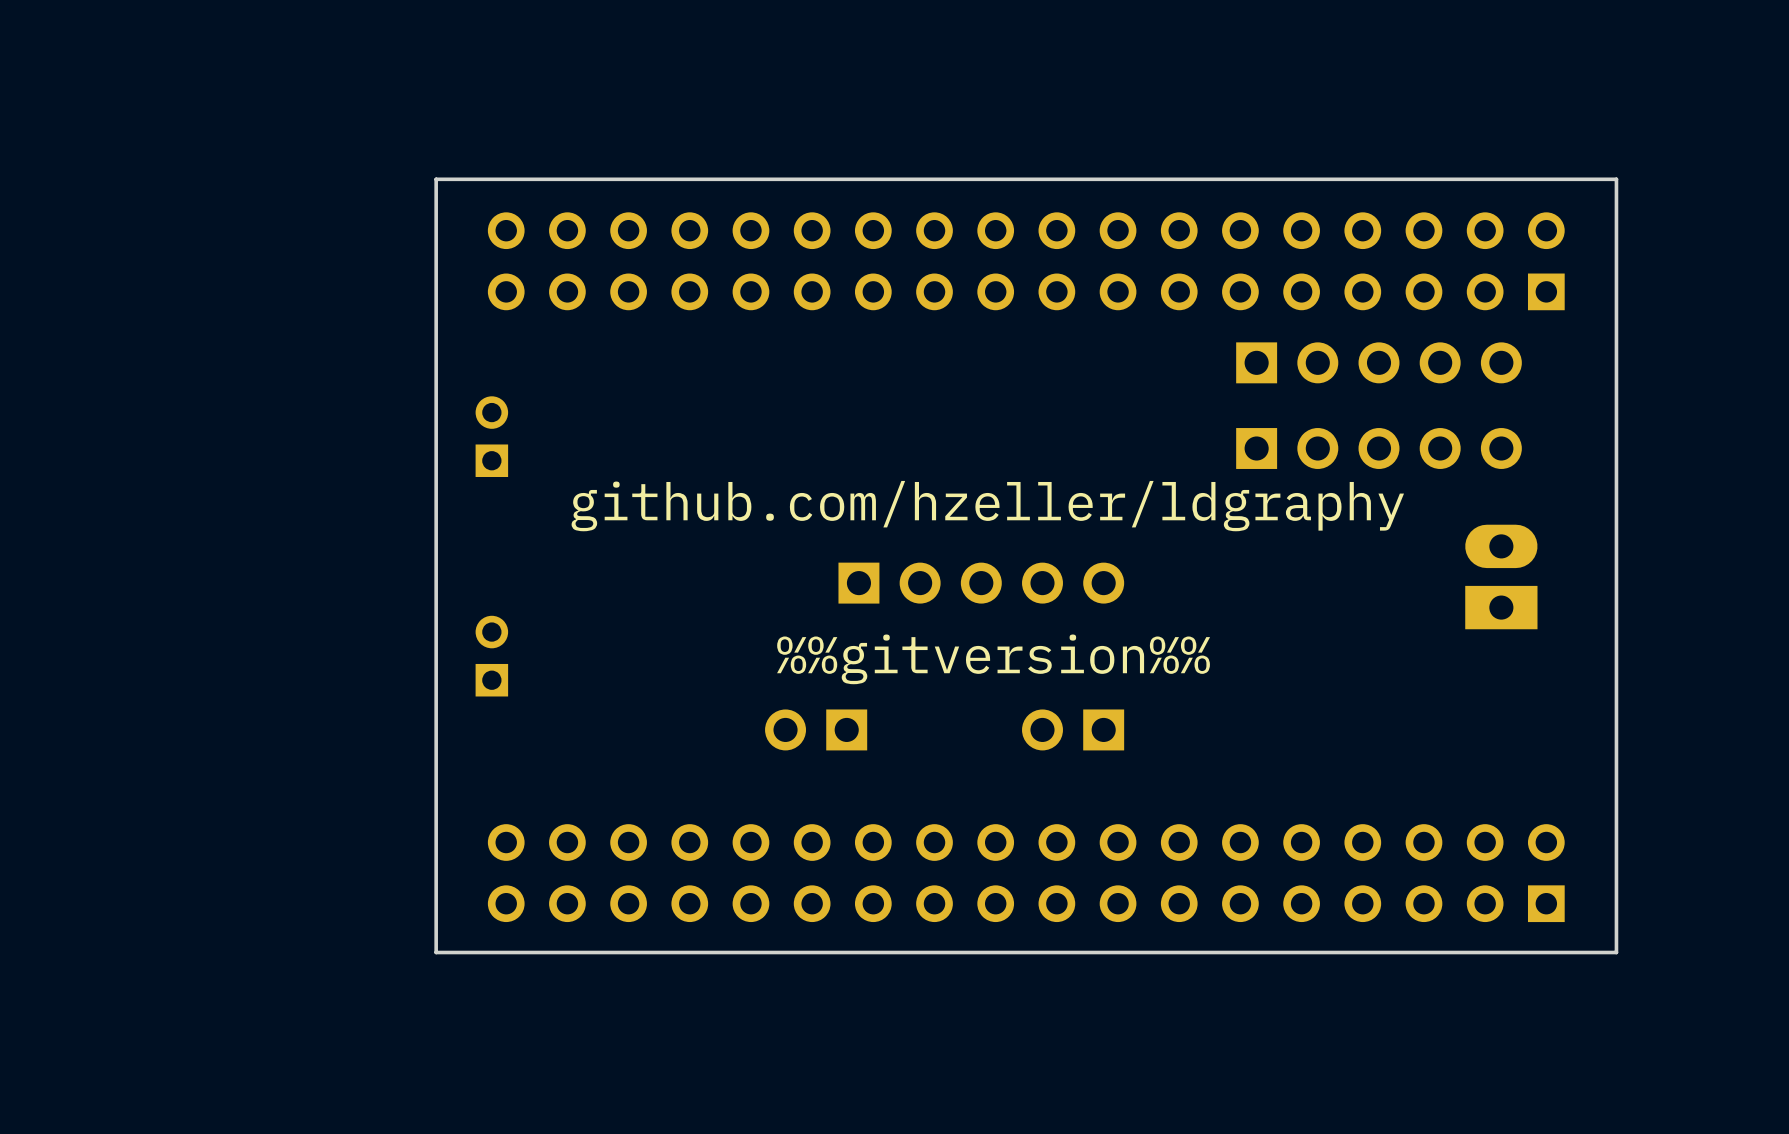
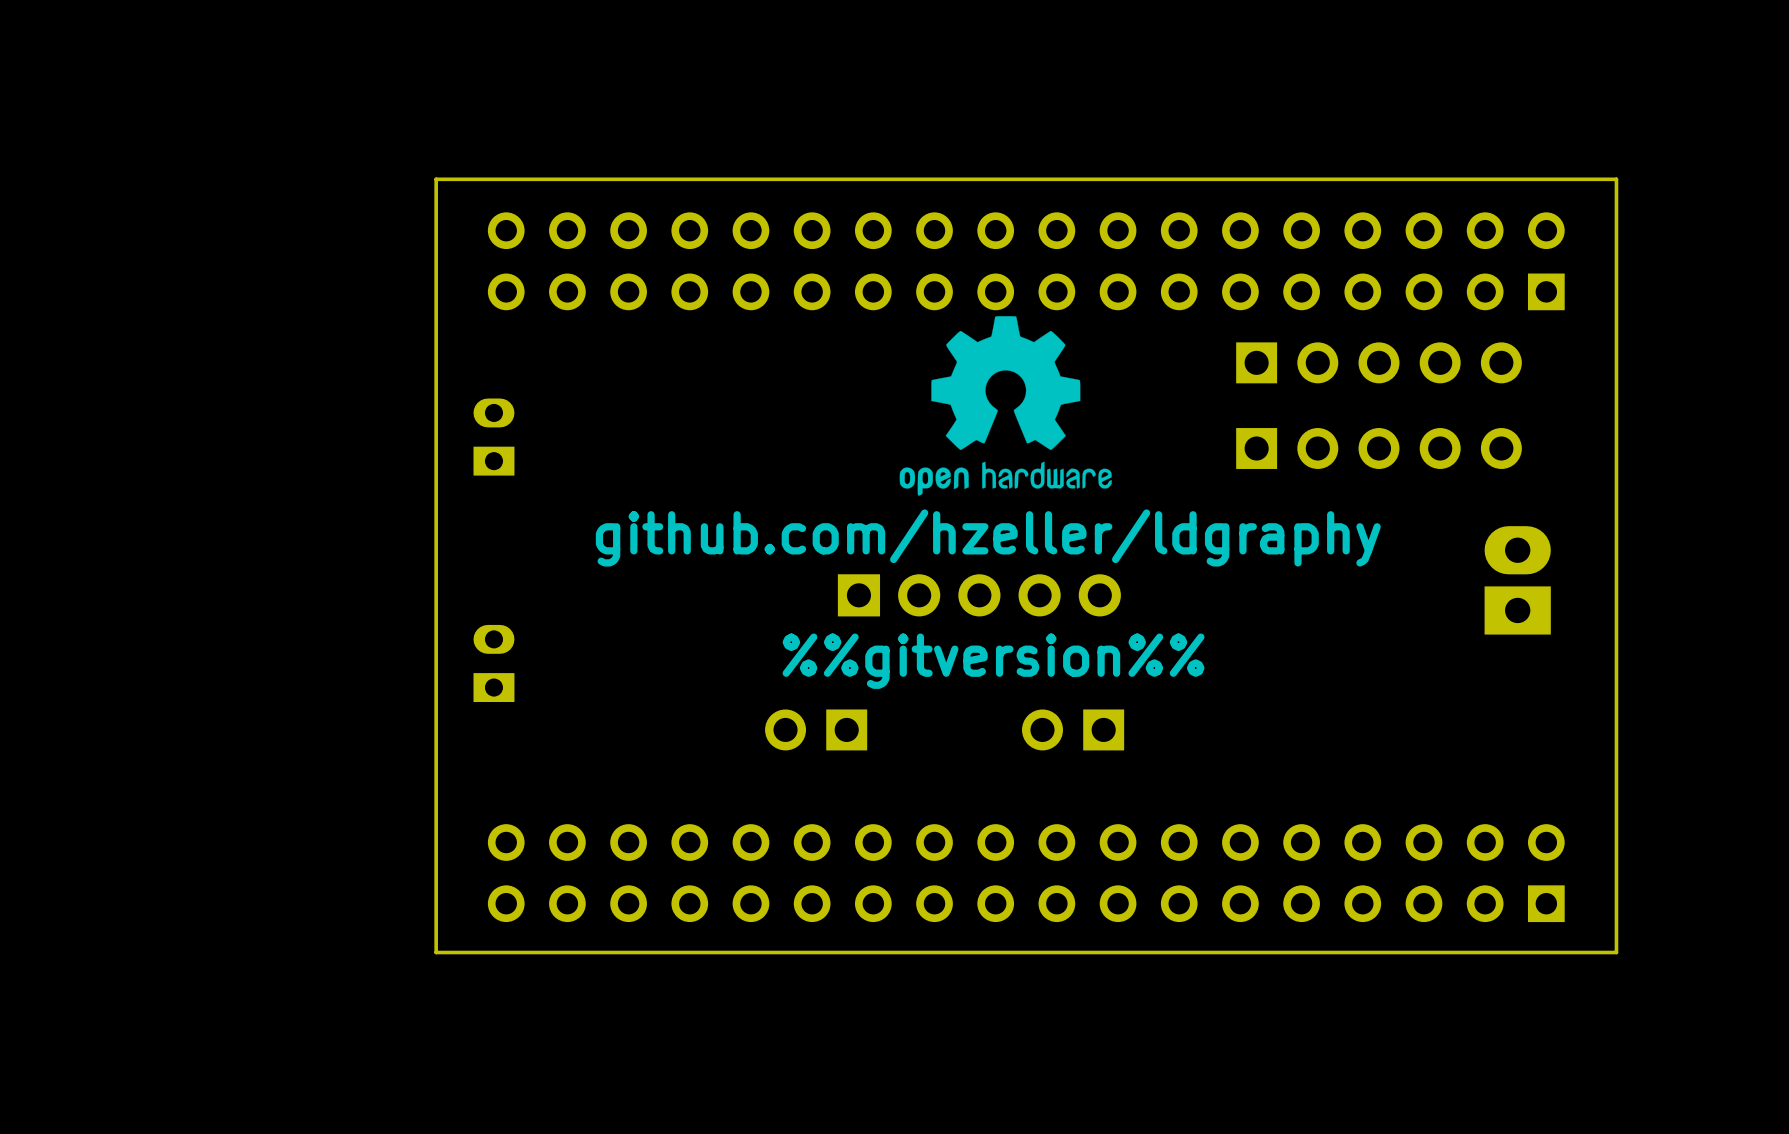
drawing: none -> [899, 316, 1112, 496]
part footprint: [475, 396, 509, 478] -> [473, 398, 515, 476]
text position: github.com/hzeller/ldgraphy (987, 506) -> github.com/hzeller/ldgraphy (988, 537)
part footprint: [1465, 524, 1538, 630] -> [1484, 526, 1551, 635]
part footprint: [838, 562, 1125, 604] -> [837, 574, 1121, 617]
part footprint: [475, 615, 509, 697] -> [473, 624, 515, 703]

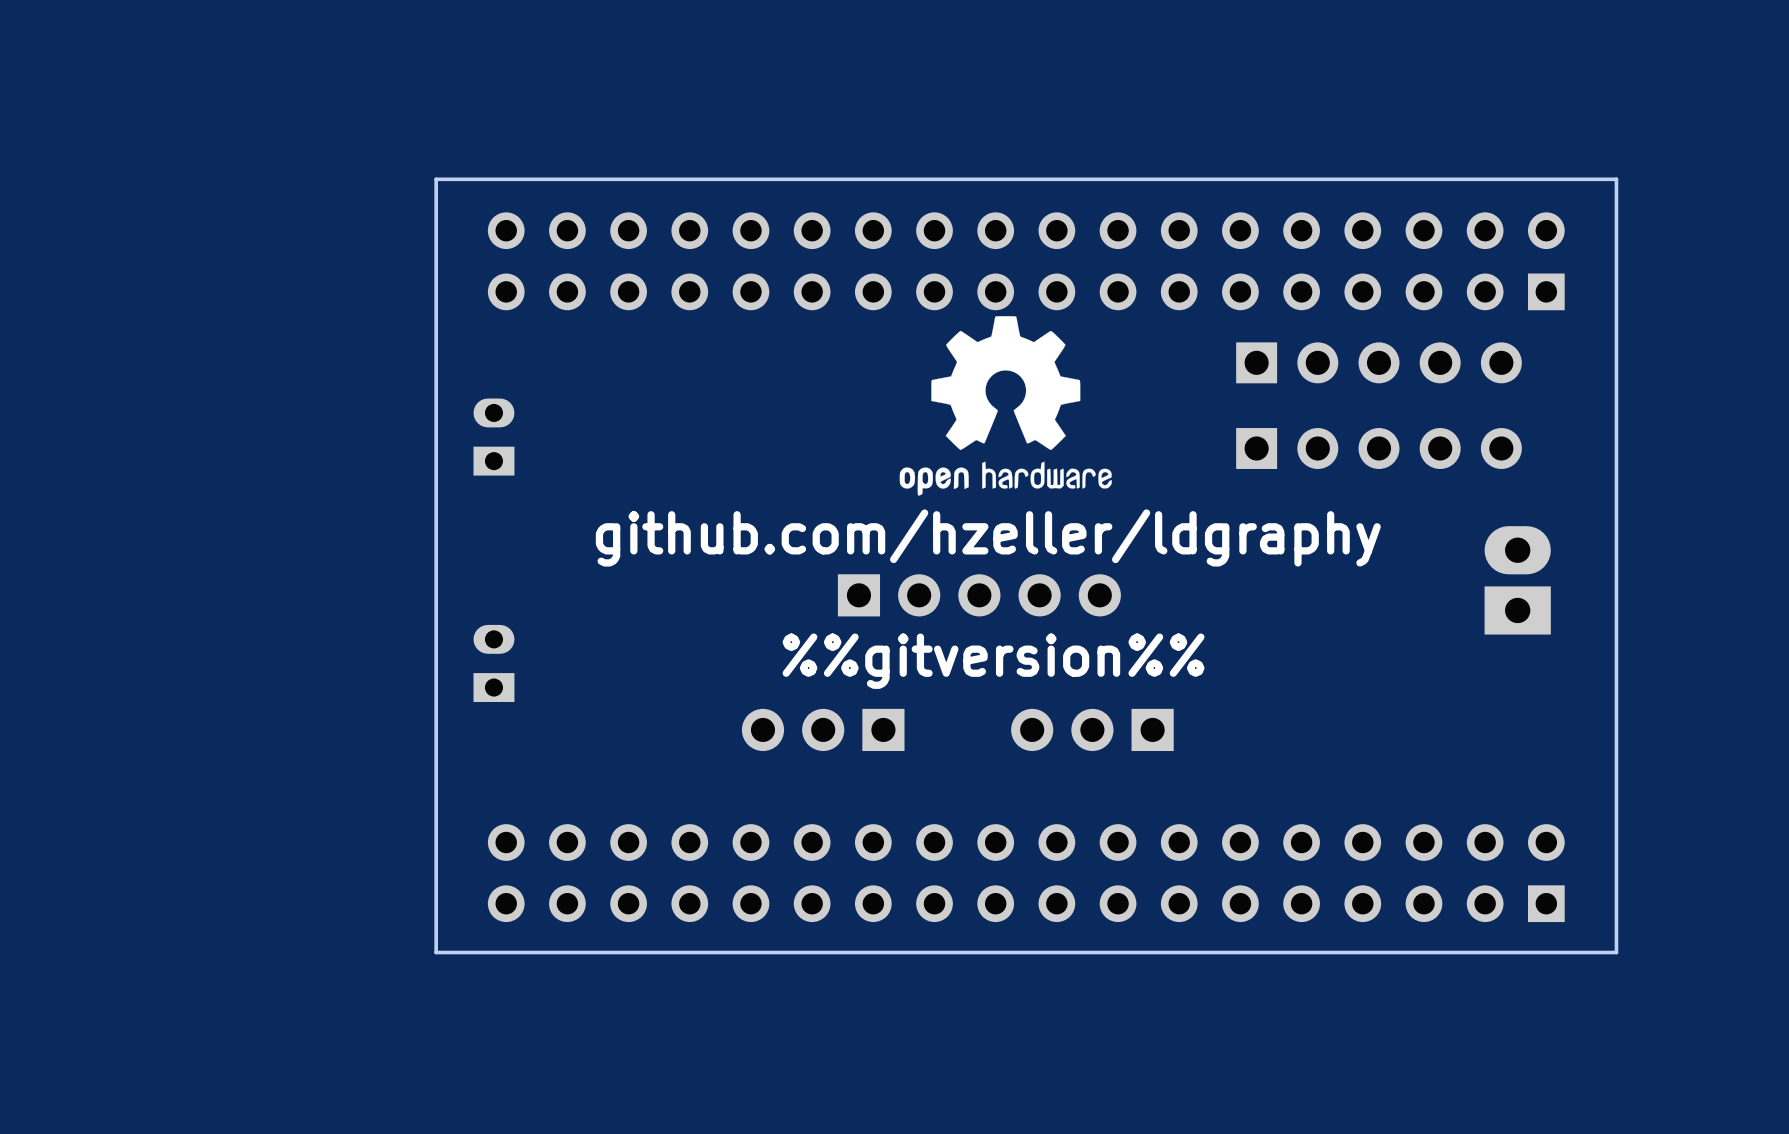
part footprint: [765, 709, 868, 751] -> [741, 708, 905, 752]
part footprint: [1022, 709, 1125, 751] -> [1011, 708, 1174, 752]

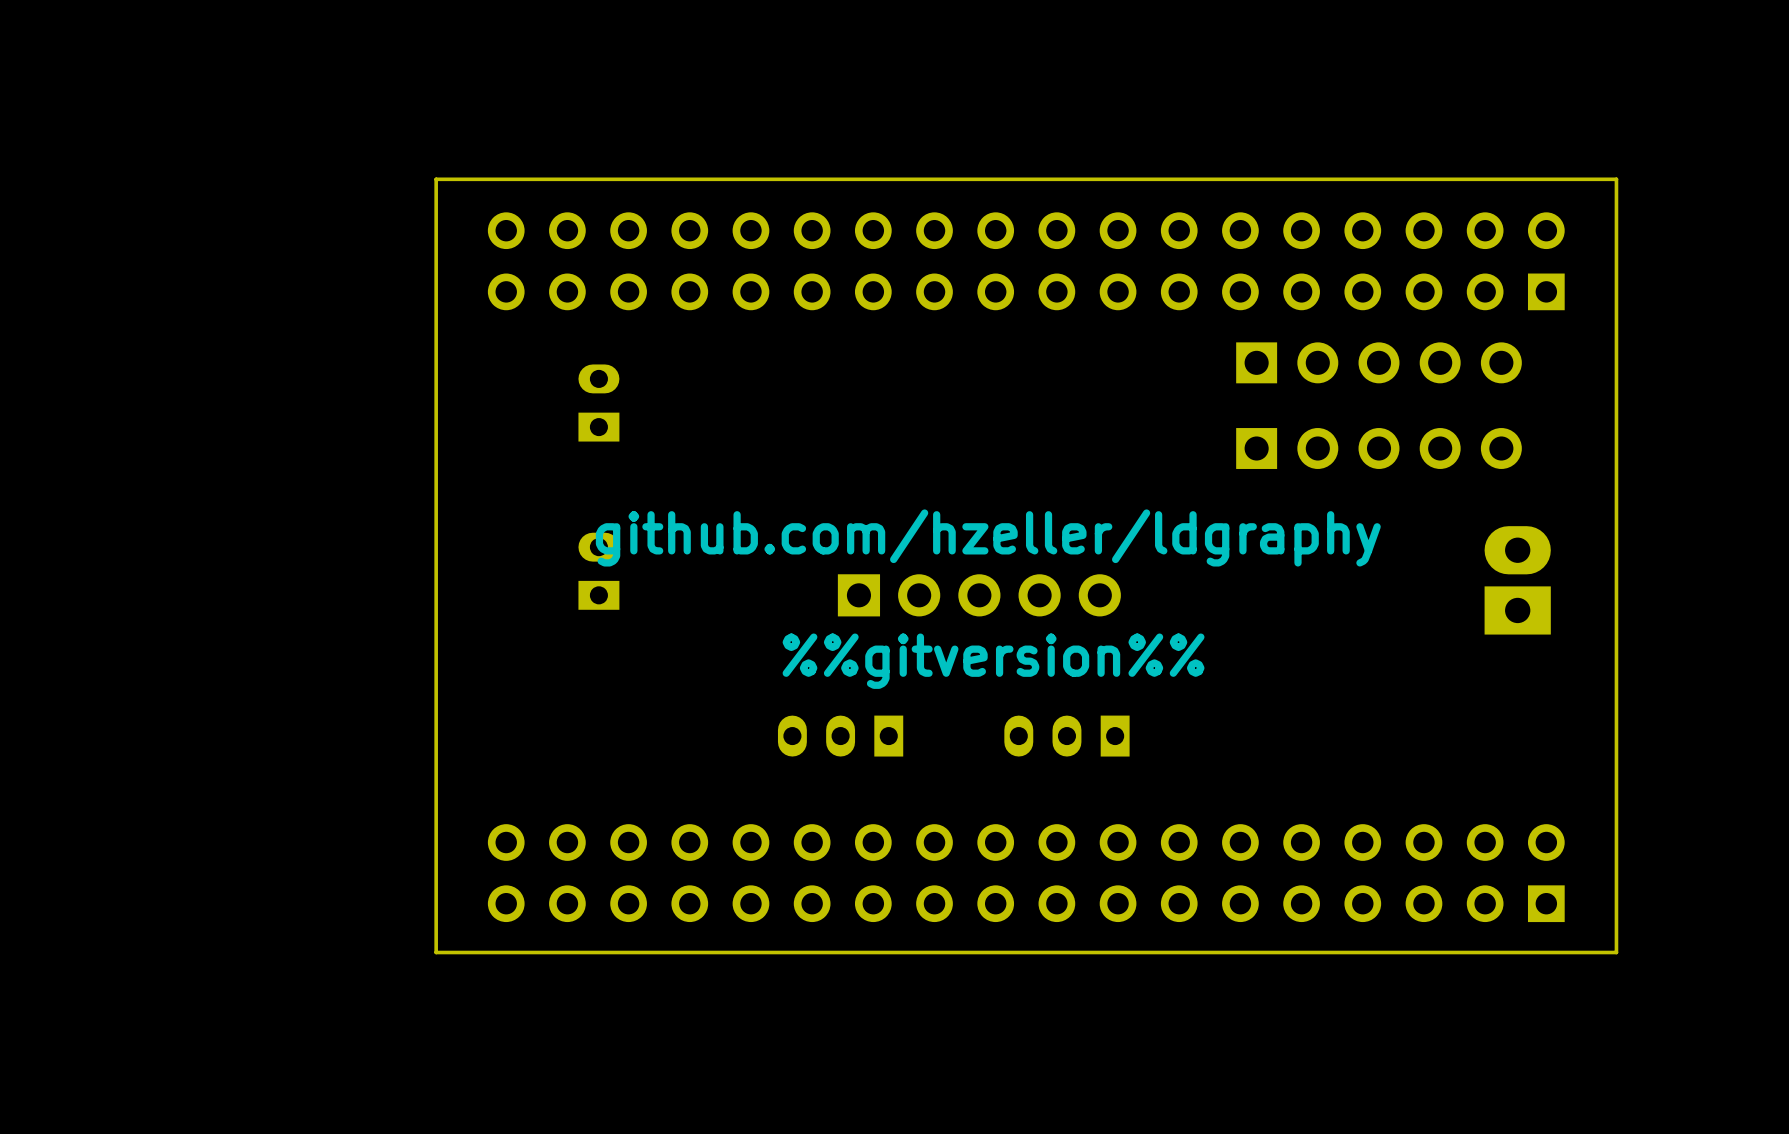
drawing: [899, 316, 1112, 496] -> none
part: none -> (598, 403)
part: (493, 437) -> none
part: none -> (598, 571)
part: (493, 663) -> none
part footprint: [741, 708, 905, 752] -> [777, 715, 904, 757]
part: (1092, 729) -> none
part: none -> (1066, 736)

